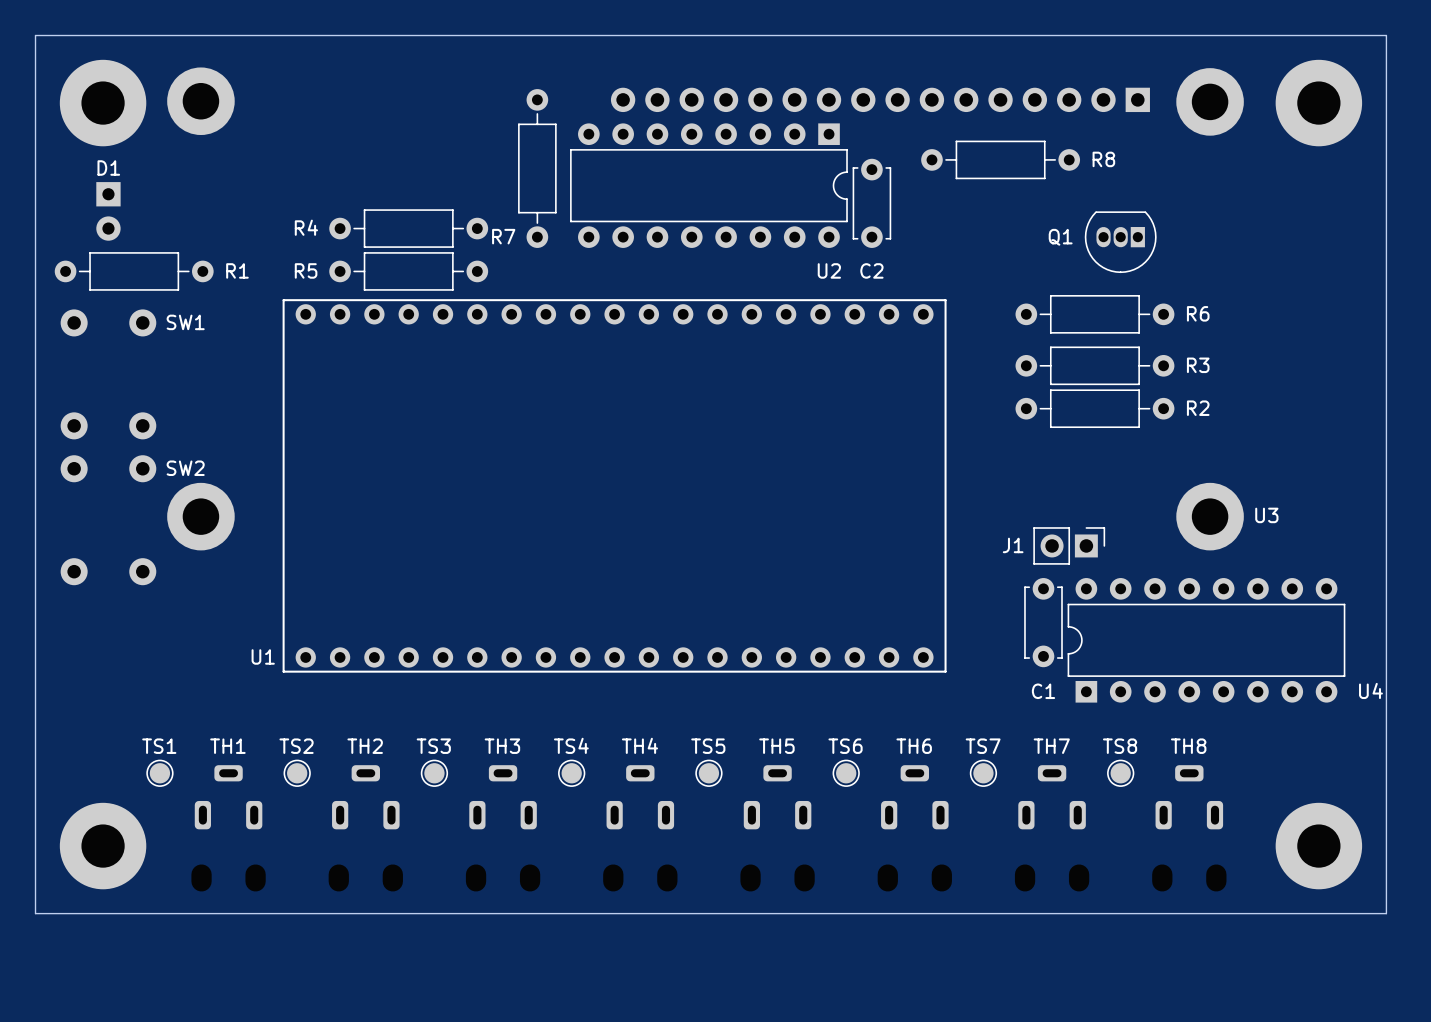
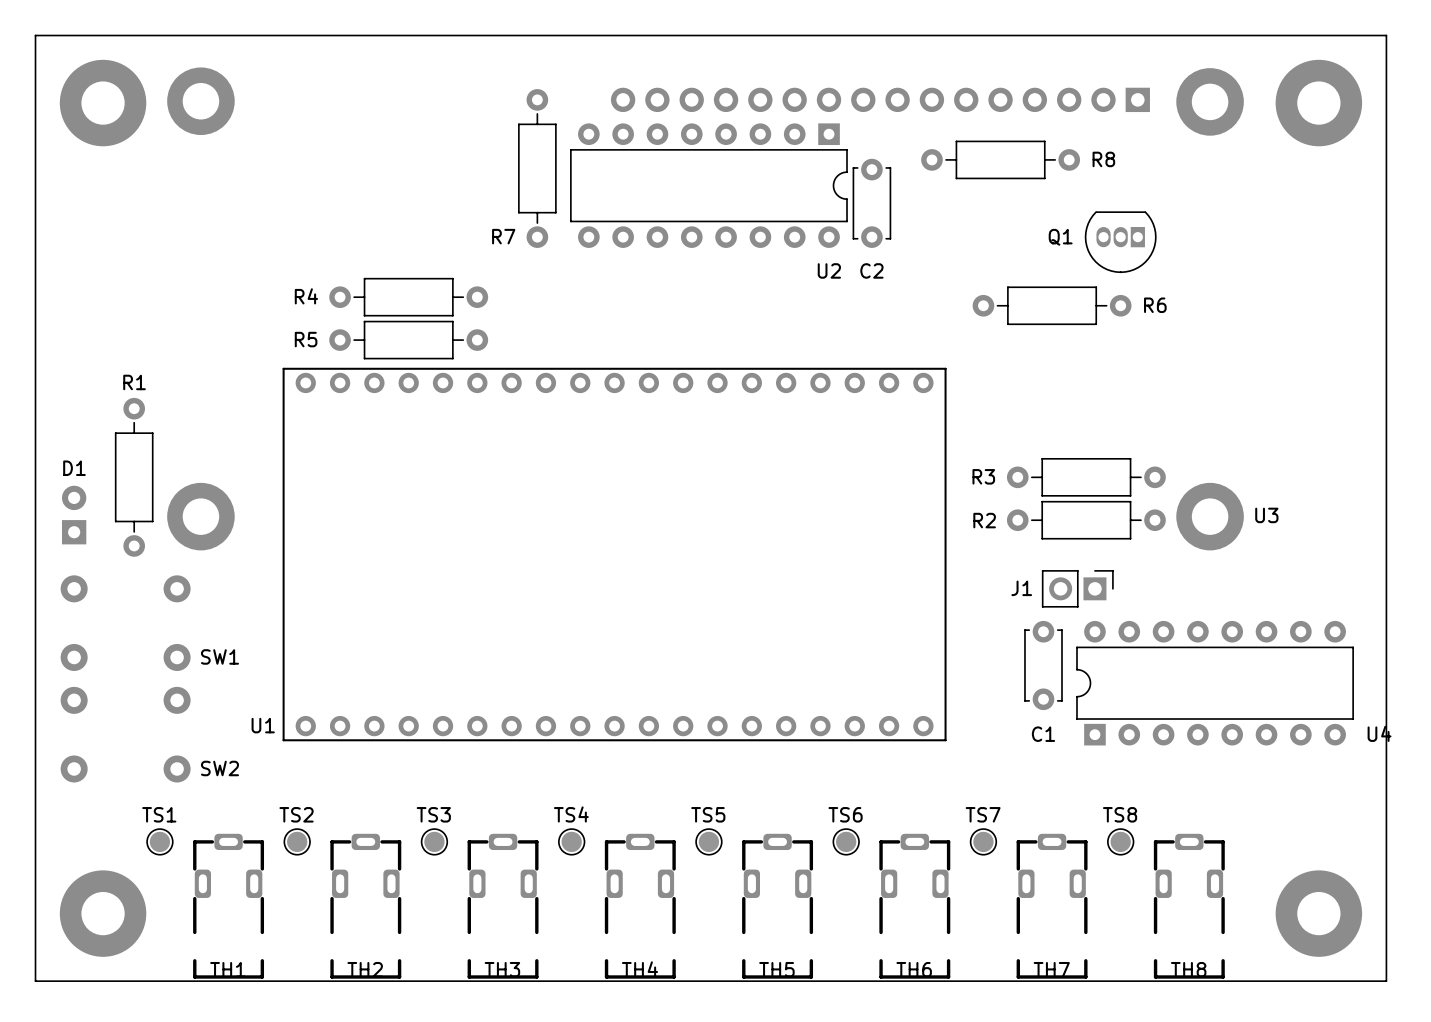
D1 rotation: 0° (108, 211) -> 180° (74, 515)
D1 position: (108, 211) -> (74, 515)
R4 position: (408, 228) -> (408, 297)
R1 name position: R1 (237, 270) -> R1 (134, 382)
R1 rotation: 0° (134, 271) -> 90° clockwise (134, 477)
R1 position: (134, 271) -> (134, 477)
R5 position: (408, 271) -> (408, 340)
R6 position: (1094, 314) -> (1052, 305)
SW1 name position: SW1 (185, 322) -> SW1 (219, 656)
R3 position: (1094, 365) -> (1086, 477)
R3 name position: R3 (1198, 365) -> R3 (983, 476)
SW1 rotation: 0° (108, 374) -> 90° clockwise (125, 623)
SW1 position: (108, 374) -> (125, 623)
R2 position: (1094, 408) -> (1086, 520)
R2 name position: R2 (1198, 408) -> R2 (984, 520)
SW2 name position: SW2 (185, 468) -> SW2 (219, 768)
U1 position: (614, 485) -> (614, 554)
SW2 rotation: 0° (108, 520) -> 90° clockwise (125, 734)
SW2 position: (108, 520) -> (125, 734)
J1 position: (1069, 545) -> (1077, 588)
C1 position: (1043, 622) -> (1043, 665)
U4 position: (1206, 640) -> (1215, 683)
TS1 position: (159, 773) -> (159, 841)
TS2 position: (297, 773) -> (297, 841)
TS3 position: (434, 773) -> (434, 841)
TS4 position: (571, 773) -> (571, 841)
TS5 position: (708, 773) -> (708, 841)
TS6 position: (846, 773) -> (846, 841)
TS7 position: (983, 773) -> (983, 841)
TS8 position: (1120, 773) -> (1120, 841)
TH1 side: bottom (228, 828) -> top (228, 906)
TH2 side: bottom (365, 828) -> top (365, 906)
TH3 side: bottom (503, 828) -> top (503, 906)
TH4 side: bottom (640, 828) -> top (640, 906)
TH5 side: bottom (777, 828) -> top (777, 906)
TH6 side: bottom (914, 828) -> top (914, 906)
TH7 side: bottom (1052, 828) -> top (1052, 906)
TH8 side: bottom (1189, 828) -> top (1189, 906)
part position: (103, 846) -> (103, 913)
part position: (1318, 846) -> (1318, 913)
board edge: (35, 913) (1386, 913) -> (35, 913) (35, 981) (1386, 981) (1386, 913)

